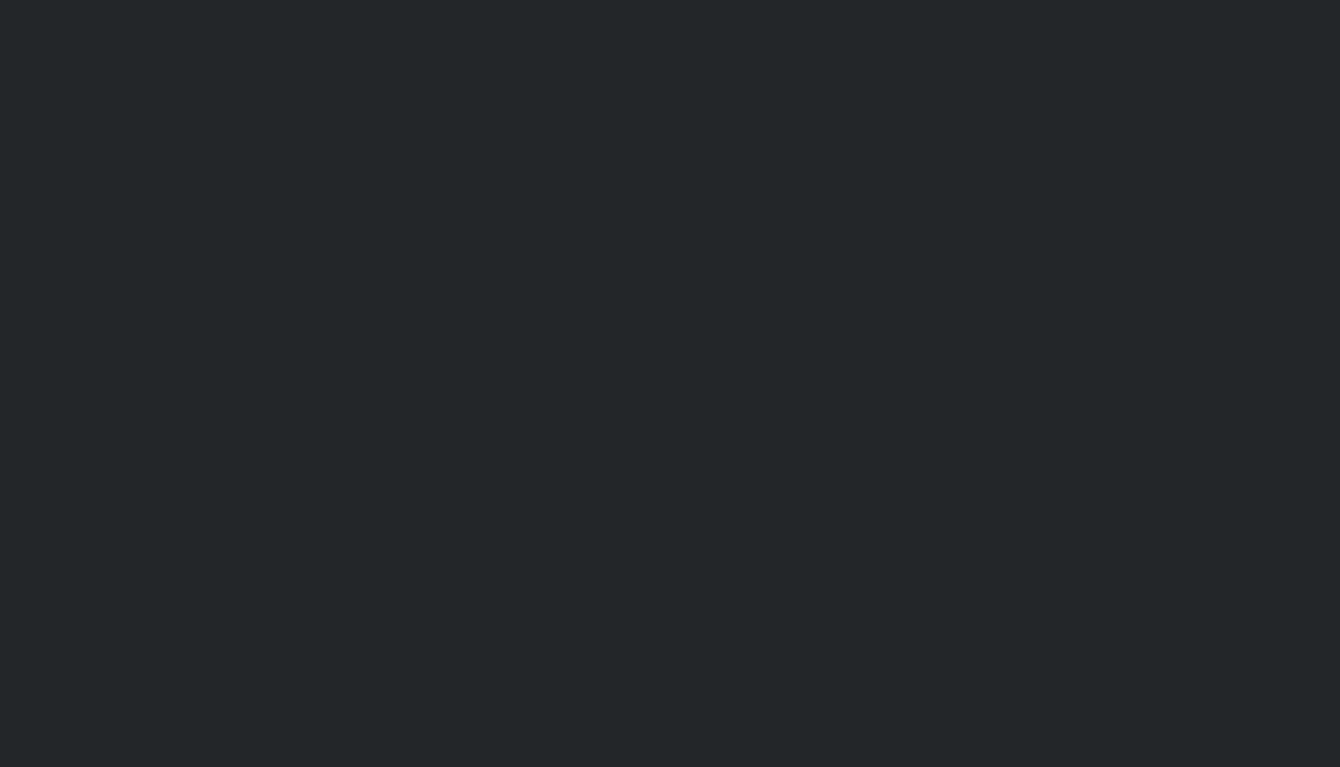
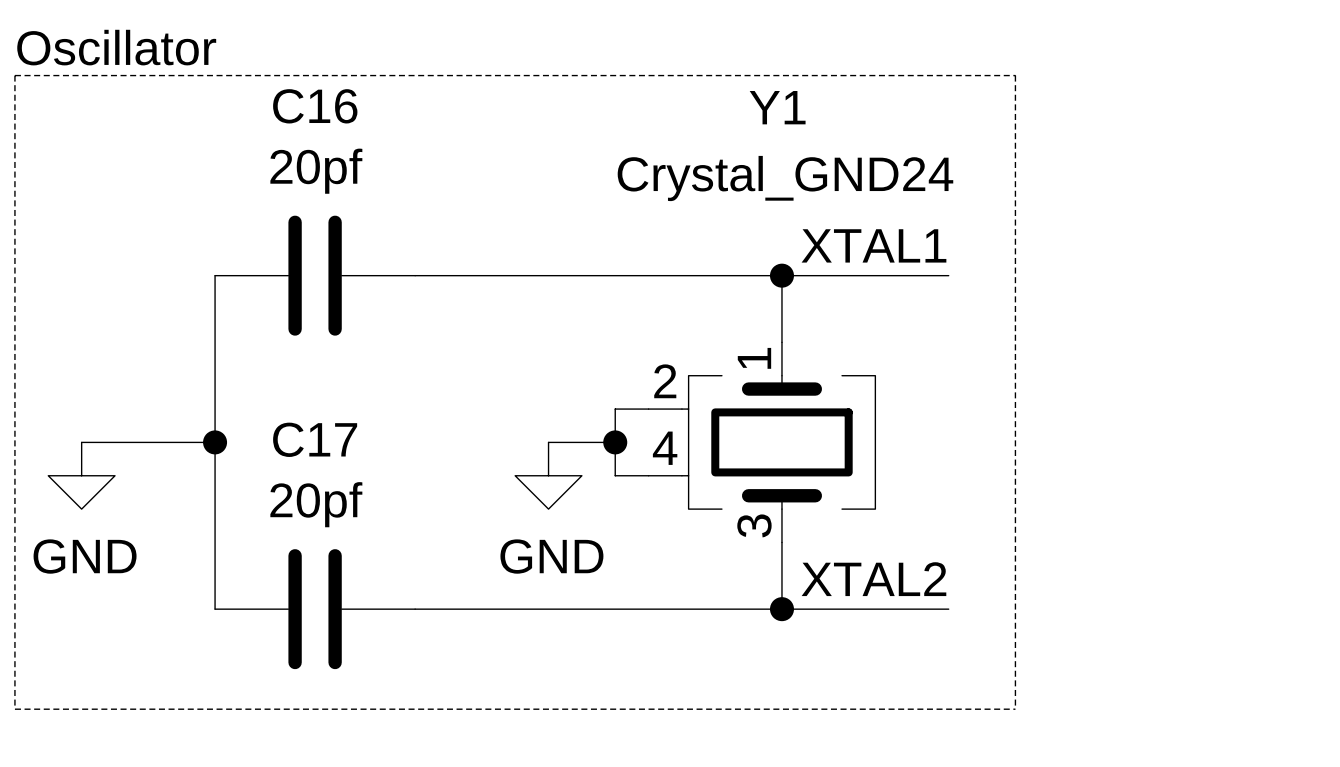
text: none -> Oscillator (116, 47)
line: none -> (14, 75) (14, 709) (1015, 709) (1015, 75) (14, 75)
label: none -> XTAL1 (873, 245)
wire: none -> (215, 275) (215, 609)
C16: none -> 20pf (315, 275)
wire: none -> (415, 275) (948, 275)
wire: none -> (781, 275) (781, 342)
junction: none -> (781, 275)
wire: none -> (648, 409) (615, 409) (615, 475) (648, 475)
wire: none -> (81, 442) (215, 442)
junction: none -> (215, 442)
wire: none -> (548, 442) (615, 442)
junction: none -> (615, 442)
Y1: none -> Crystal_GND24 (761, 442)
power symbol: none -> GND (81, 475)
power symbol: none -> GND (548, 475)
wire: none -> (781, 542) (781, 609)
label: none -> XTAL2 (873, 579)
C17: none -> 20pf (315, 609)
wire: none -> (415, 609) (948, 609)
junction: none -> (781, 609)

